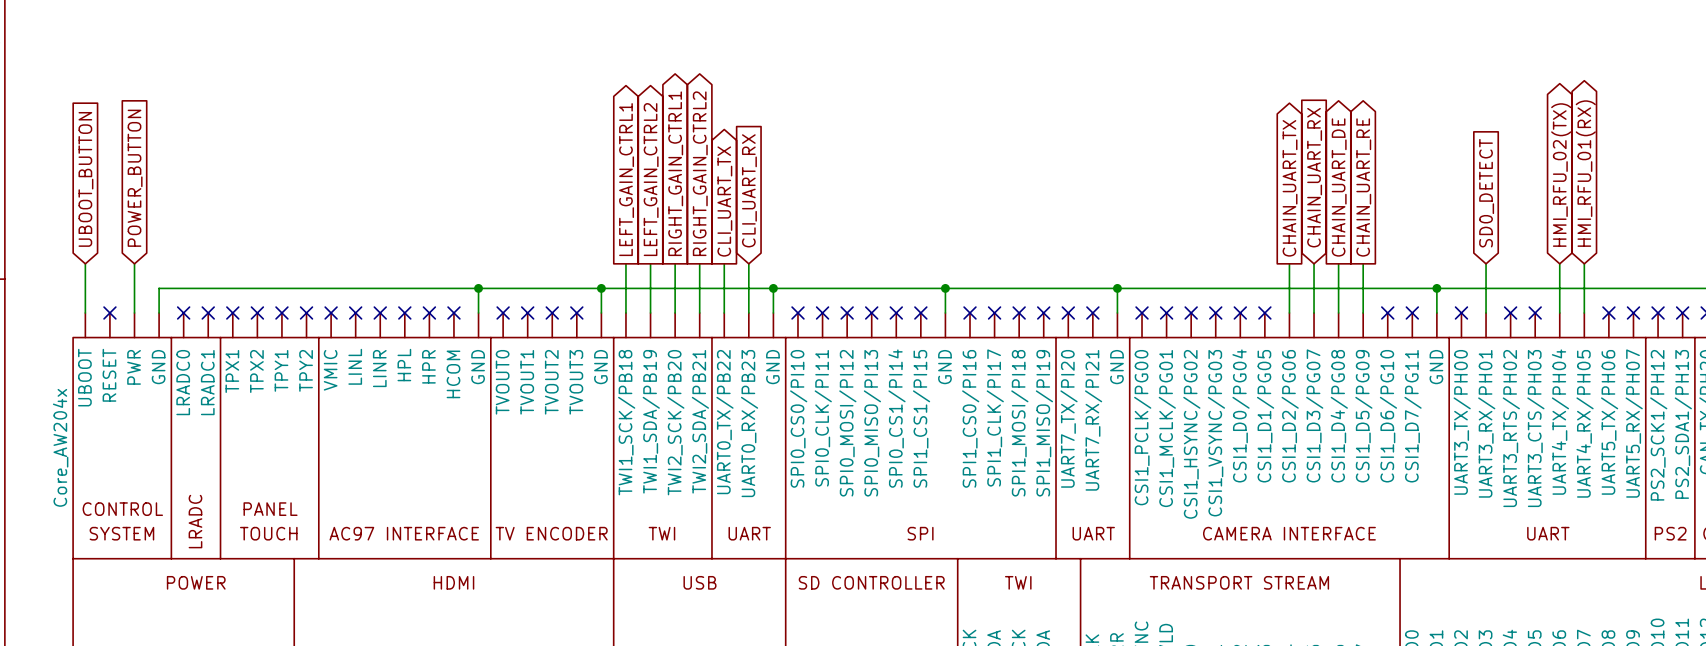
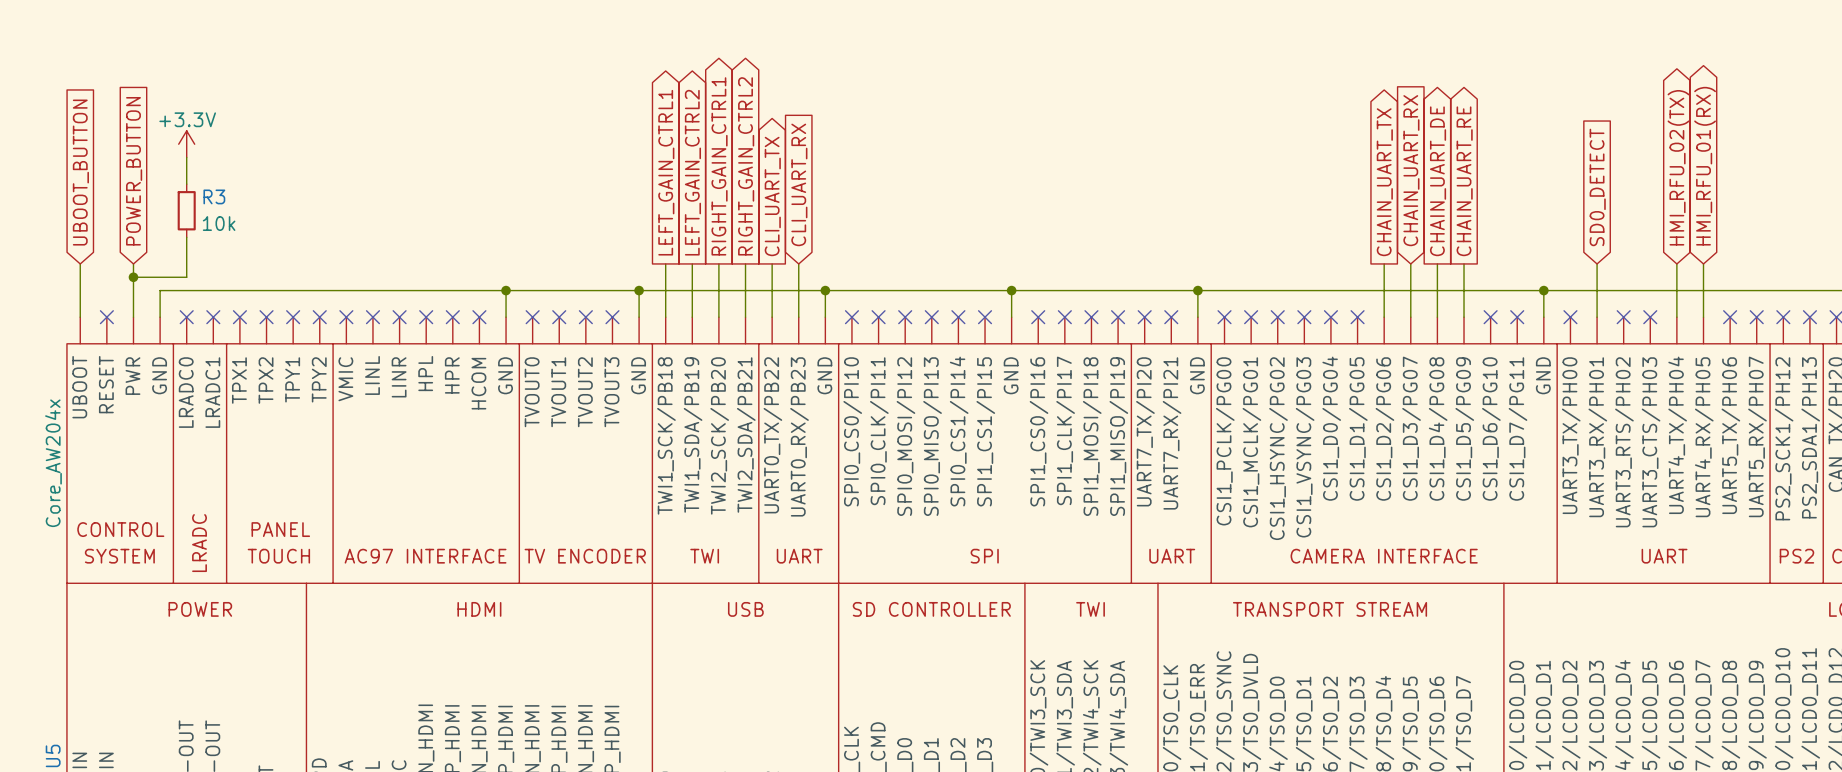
power symbol: none -> +3.3V (186, 144)
wire: none -> (186, 157) (186, 184)
R3: none -> 10k (186, 210)
wire: none -> (186, 237) (186, 277) (133, 277)
junction: none -> (133, 277)

